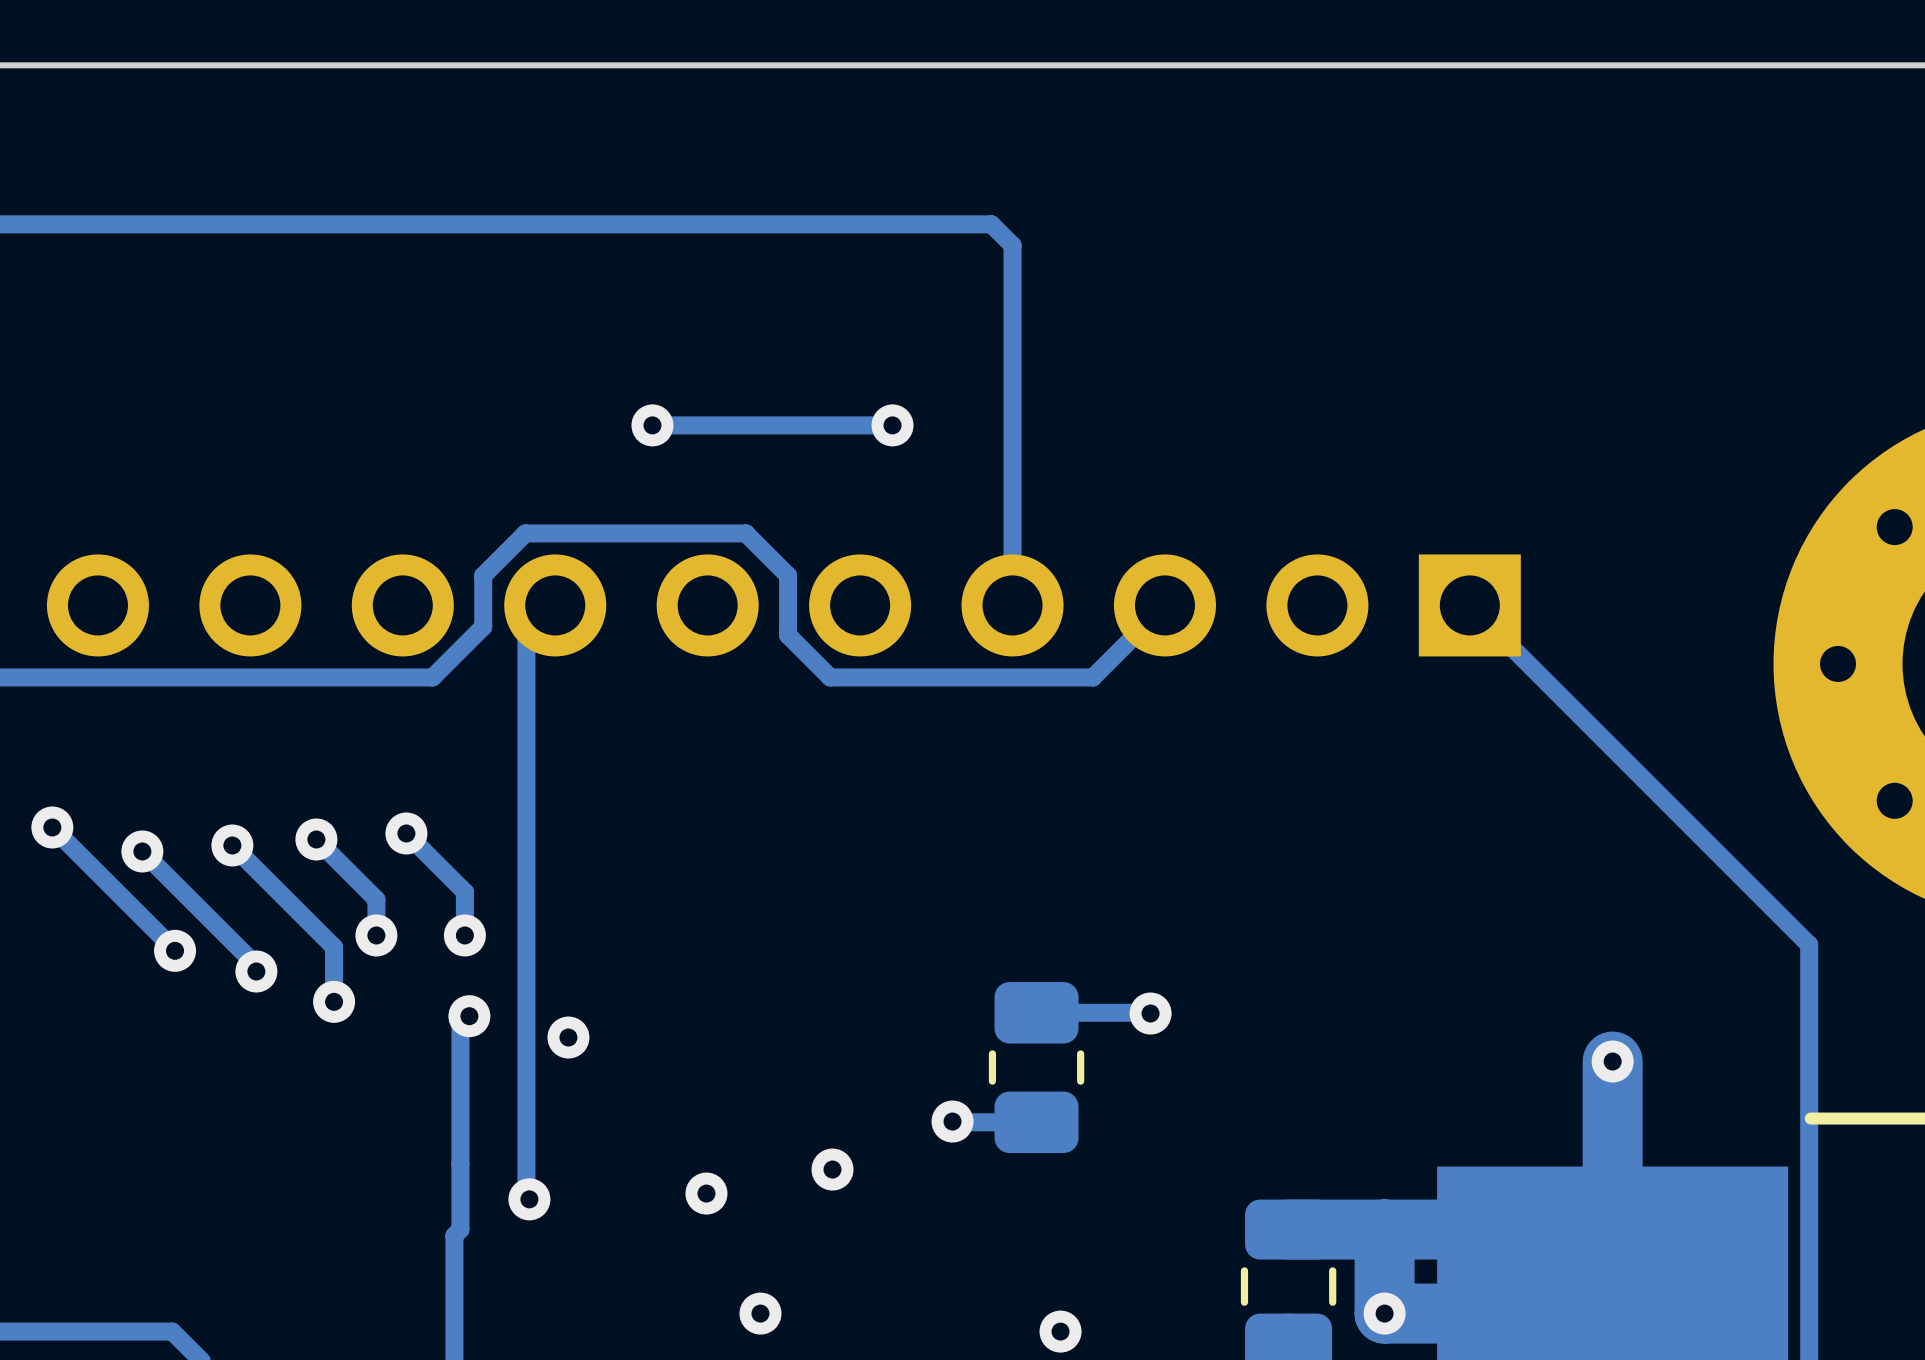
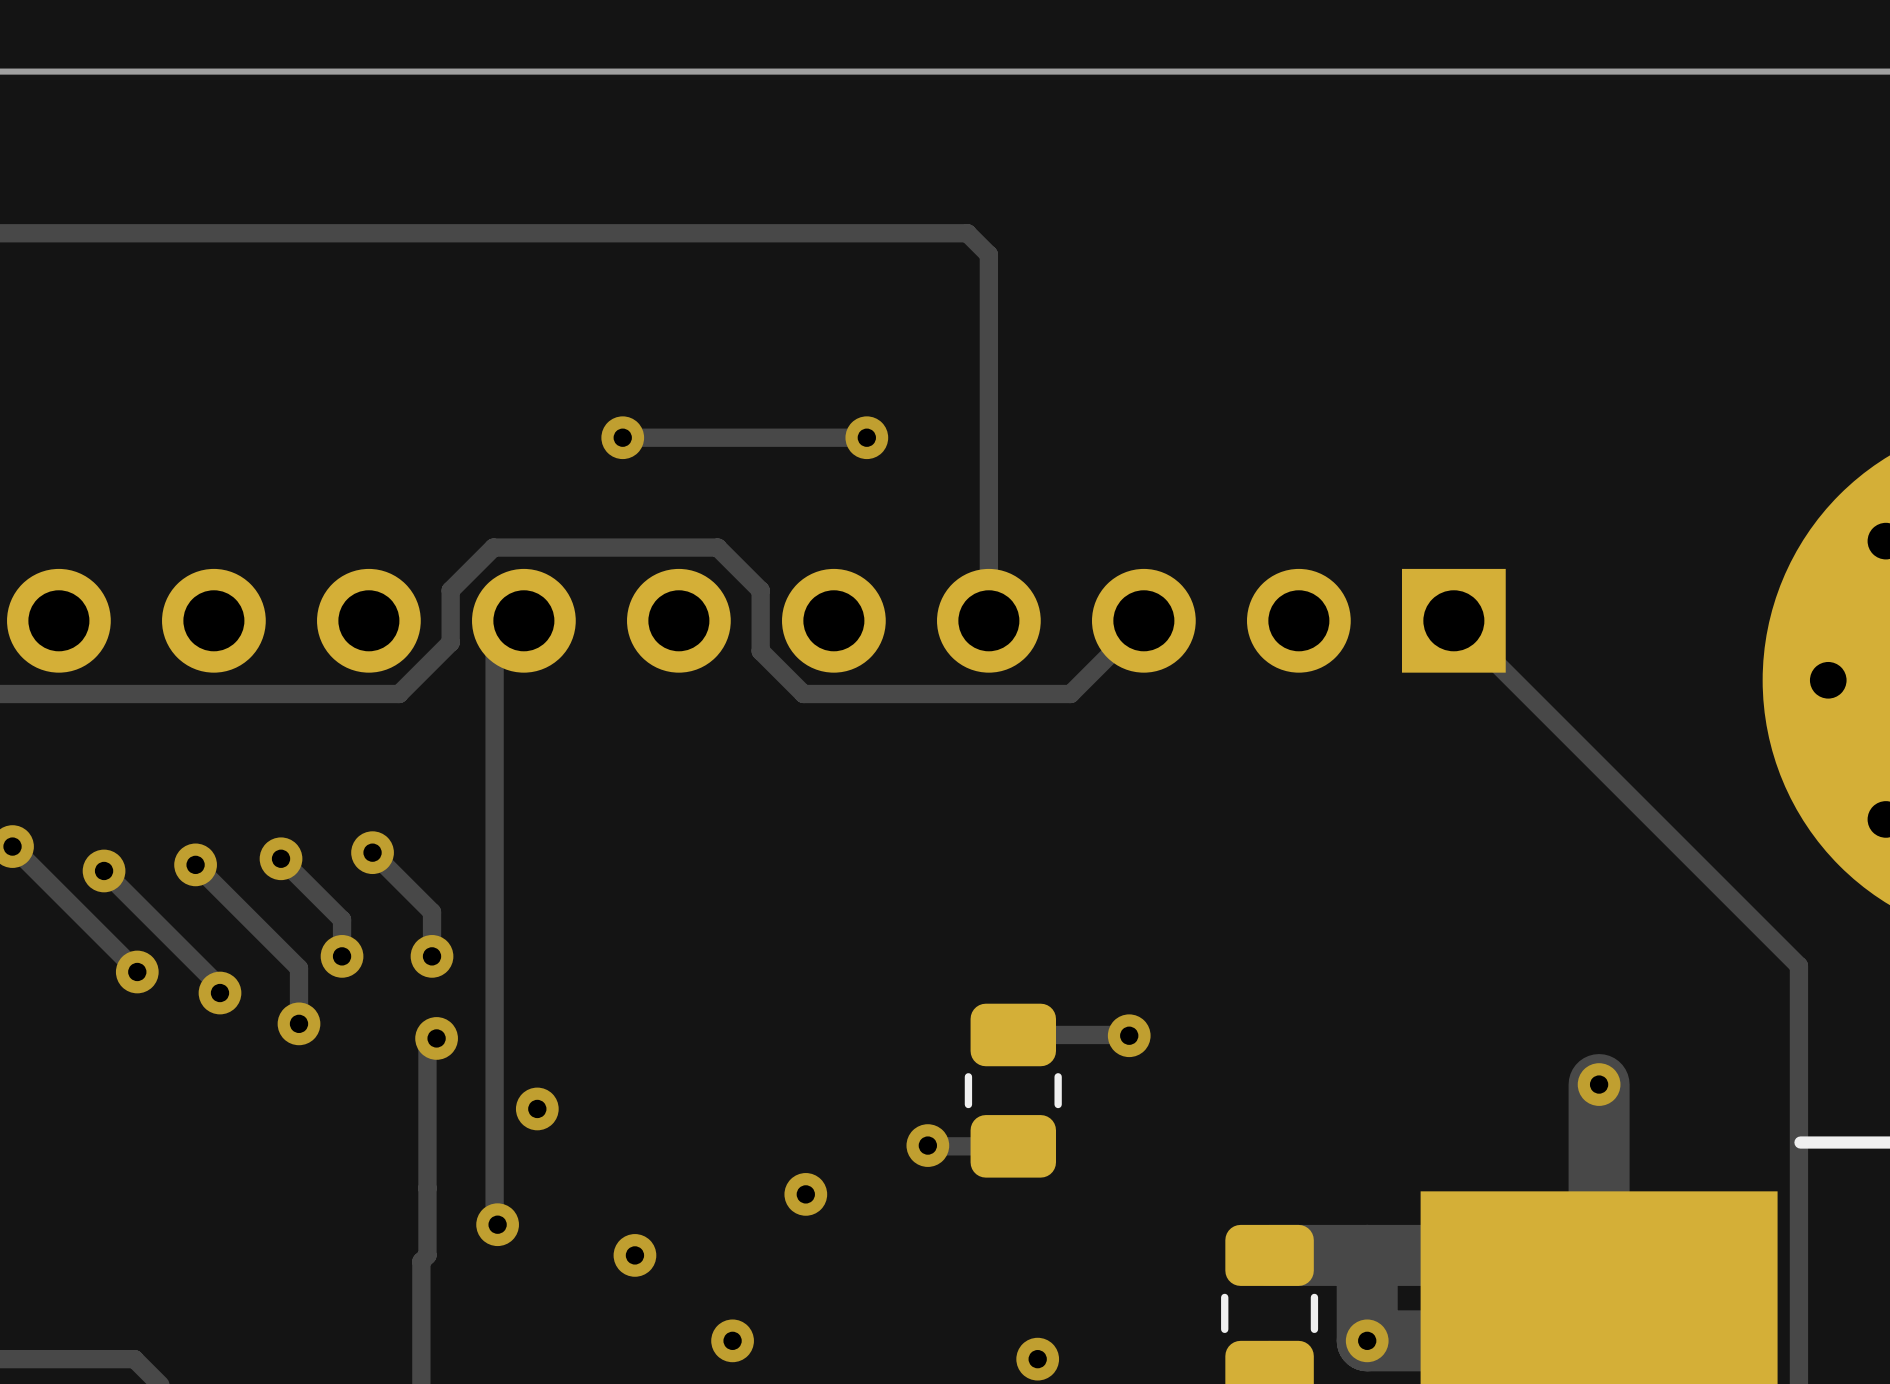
via position: (568, 1037) -> (537, 1108)
via position: (706, 1193) -> (634, 1255)

